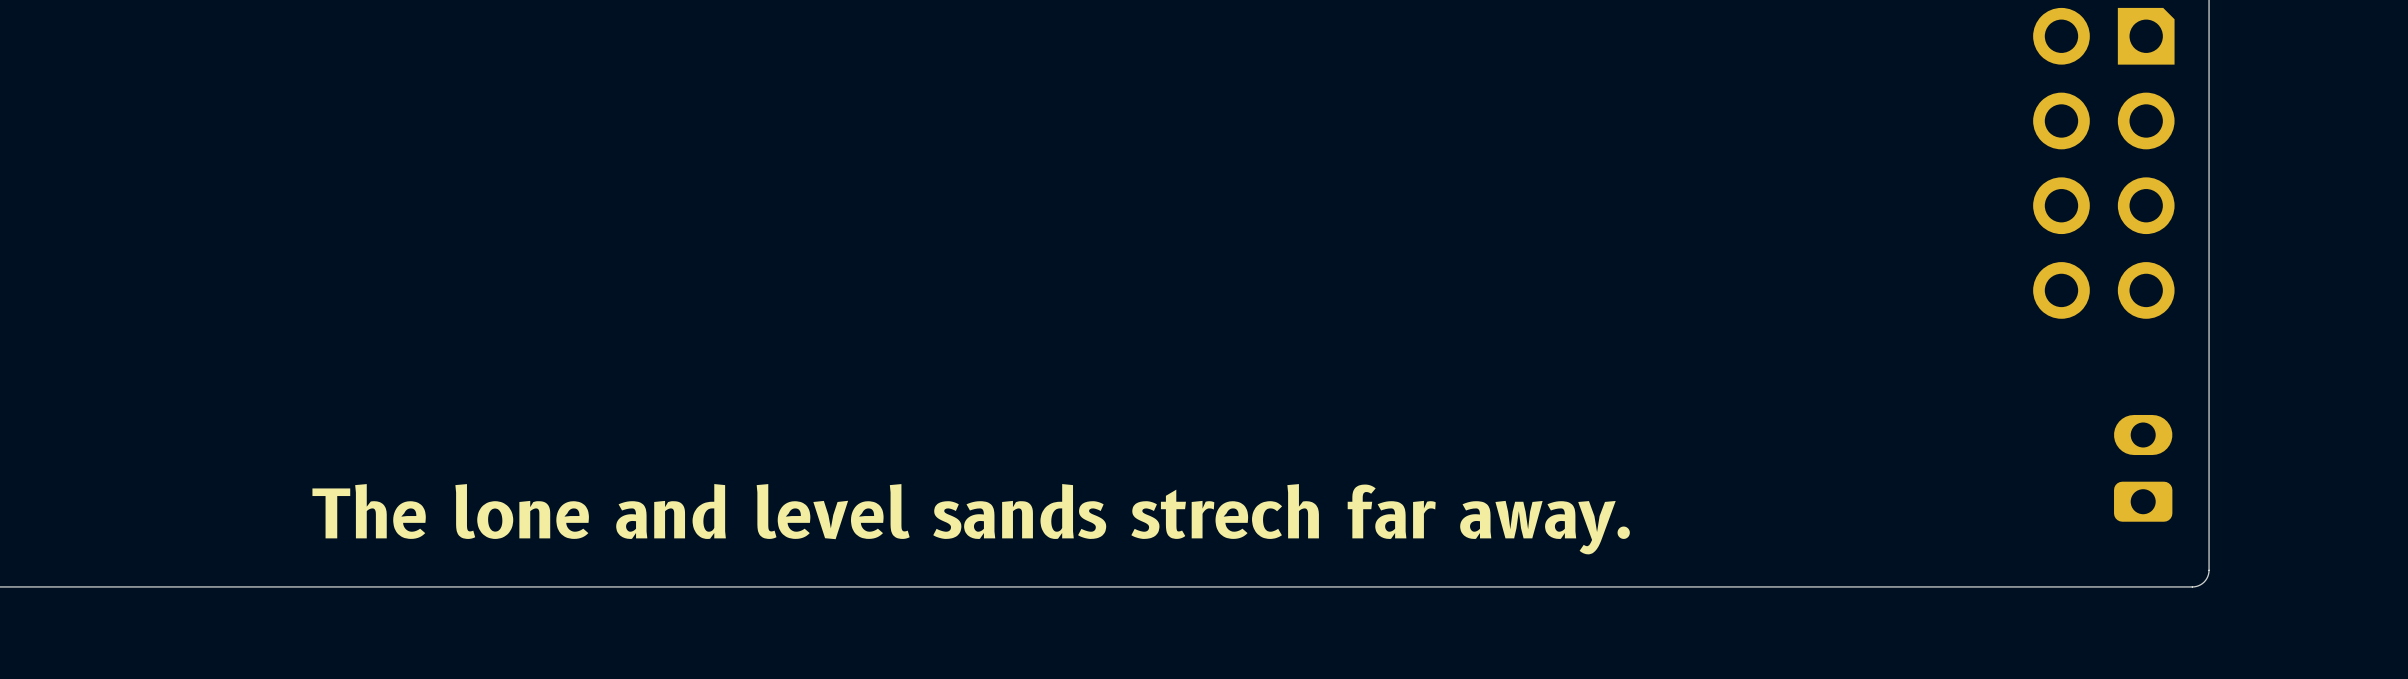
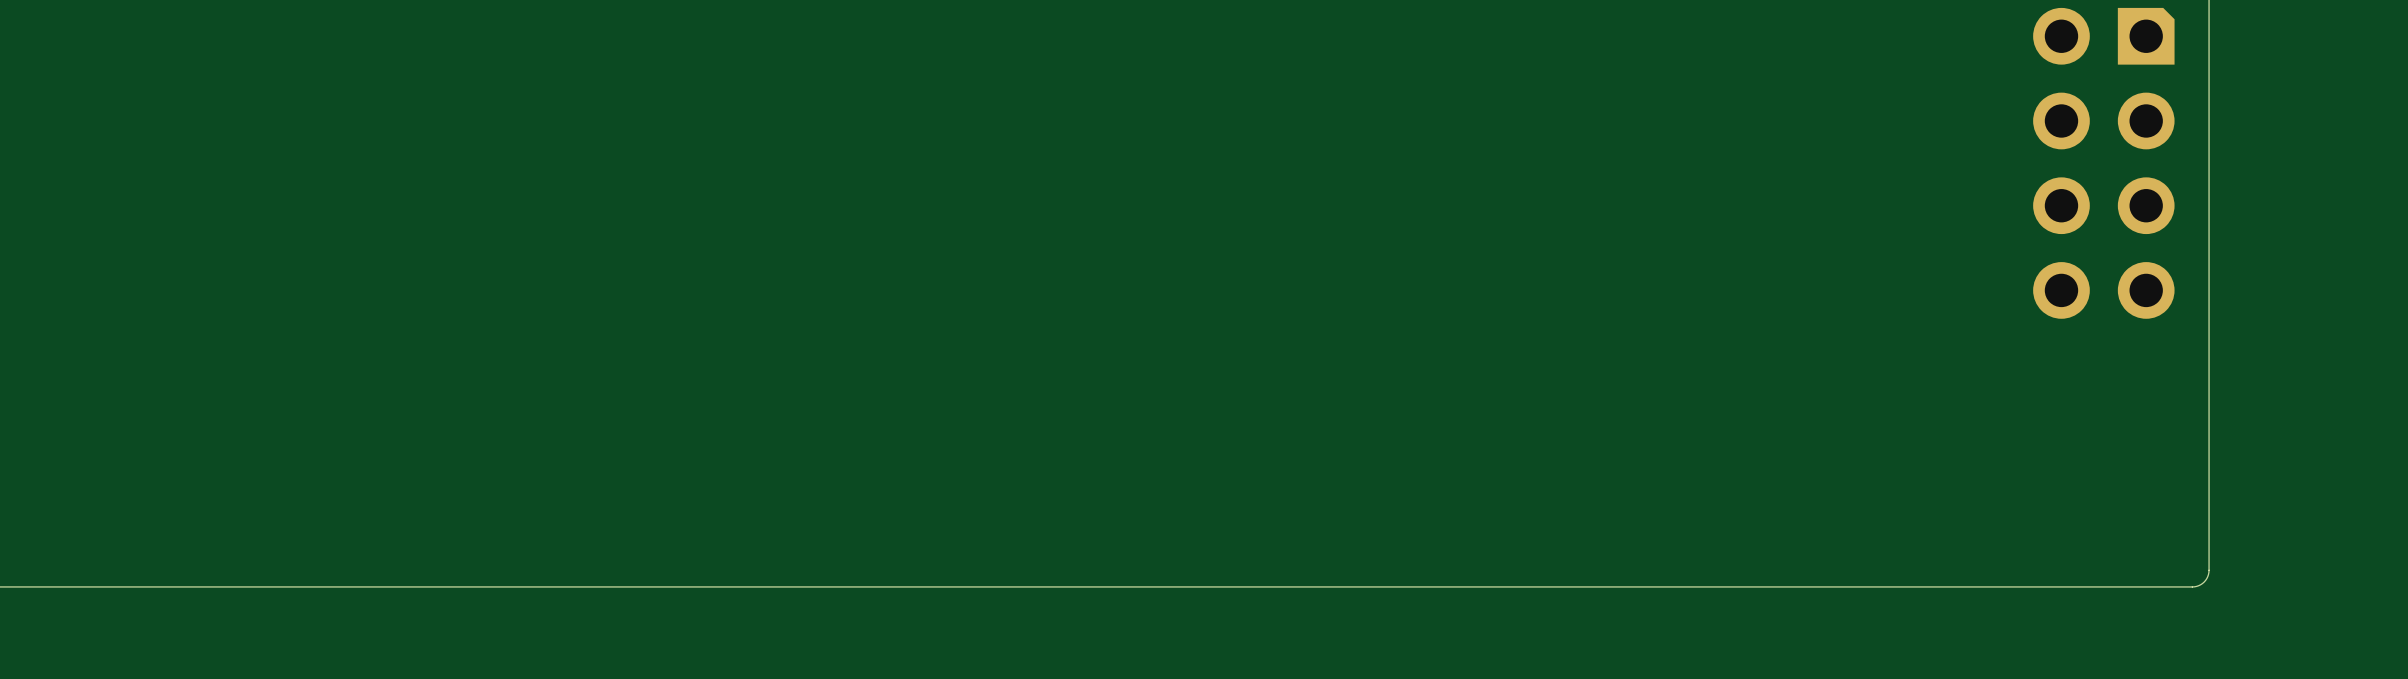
part: (2143, 468) -> none
text: The lone and level sands strech far away. (971, 519) -> none

